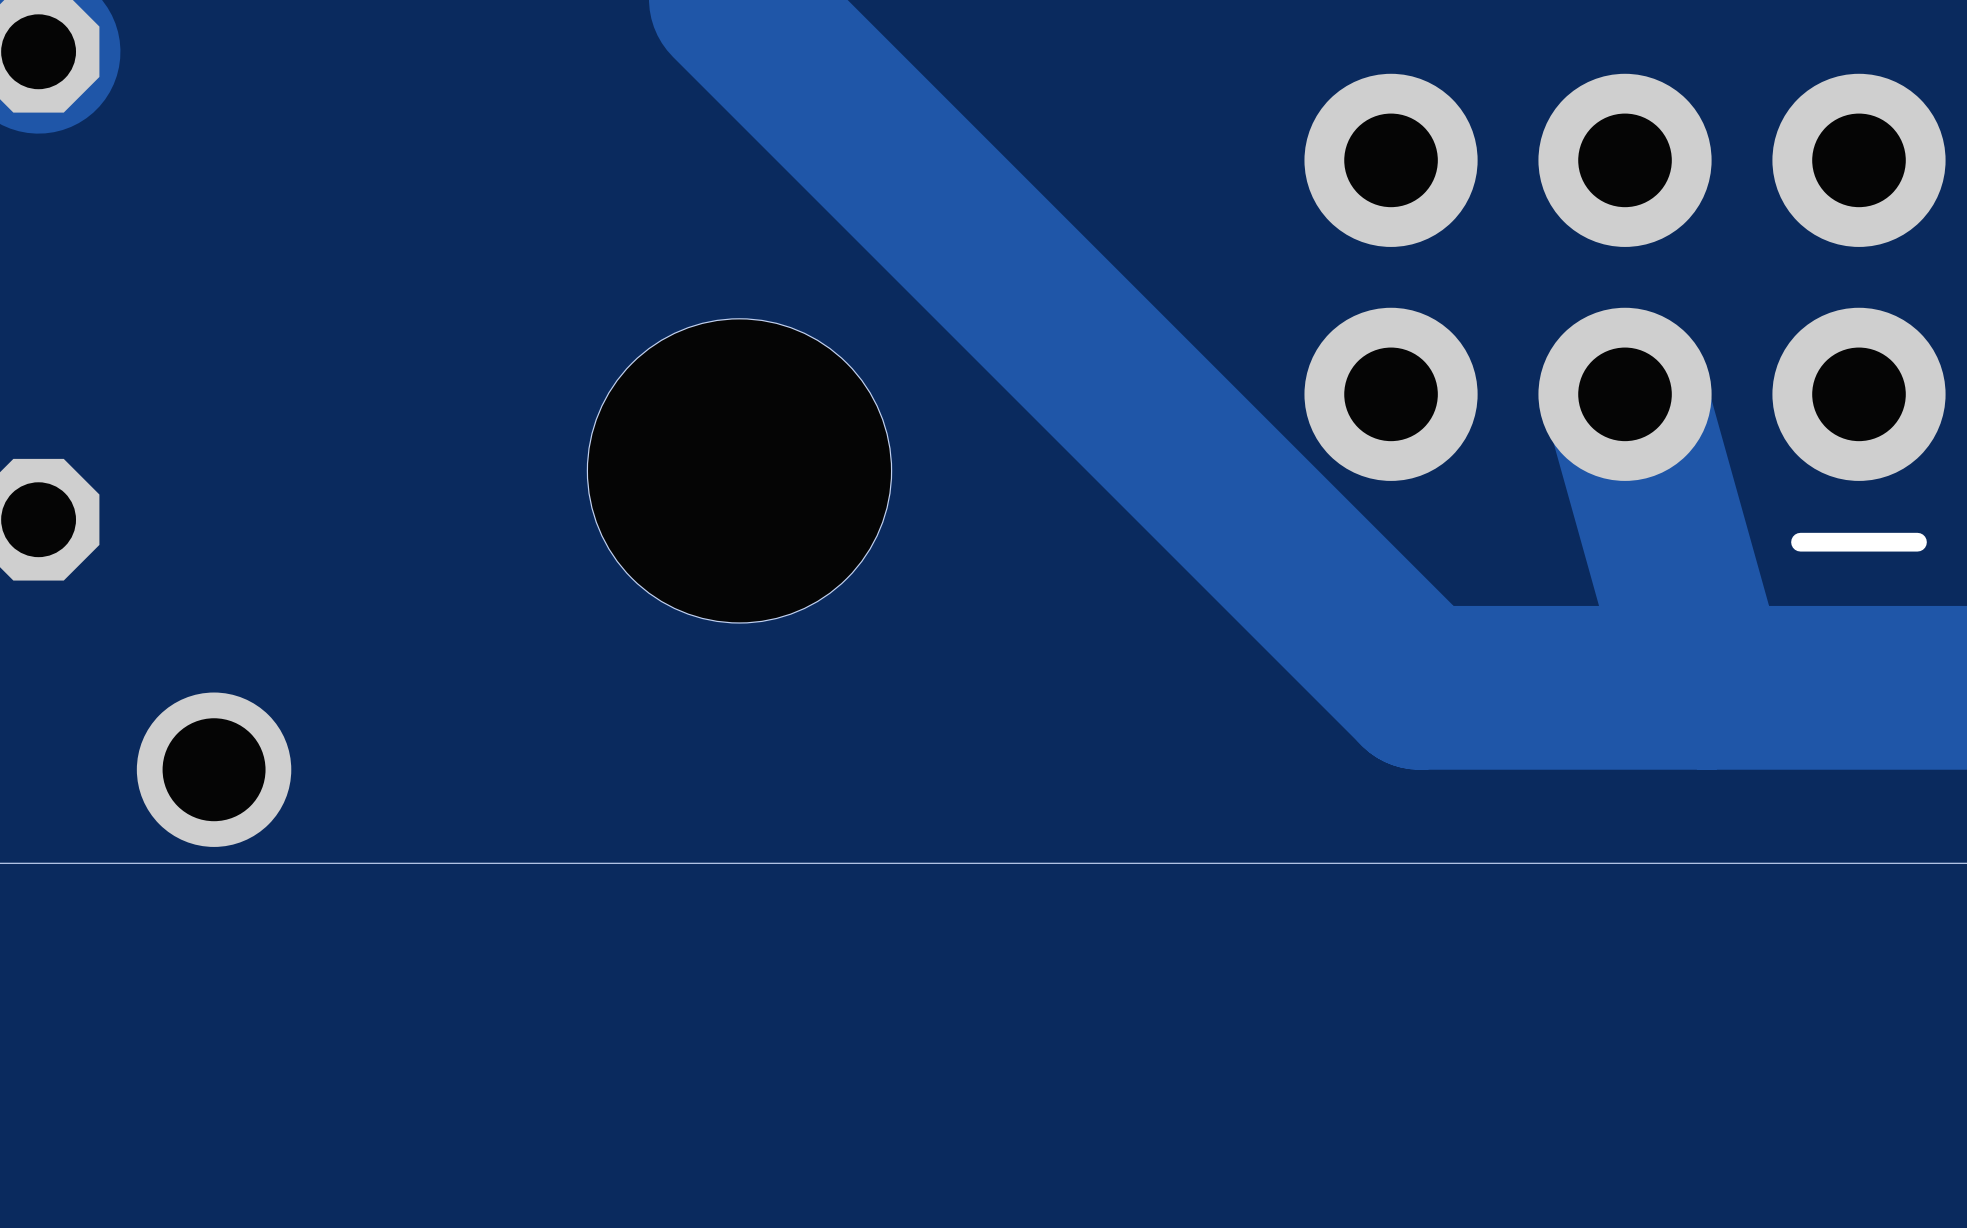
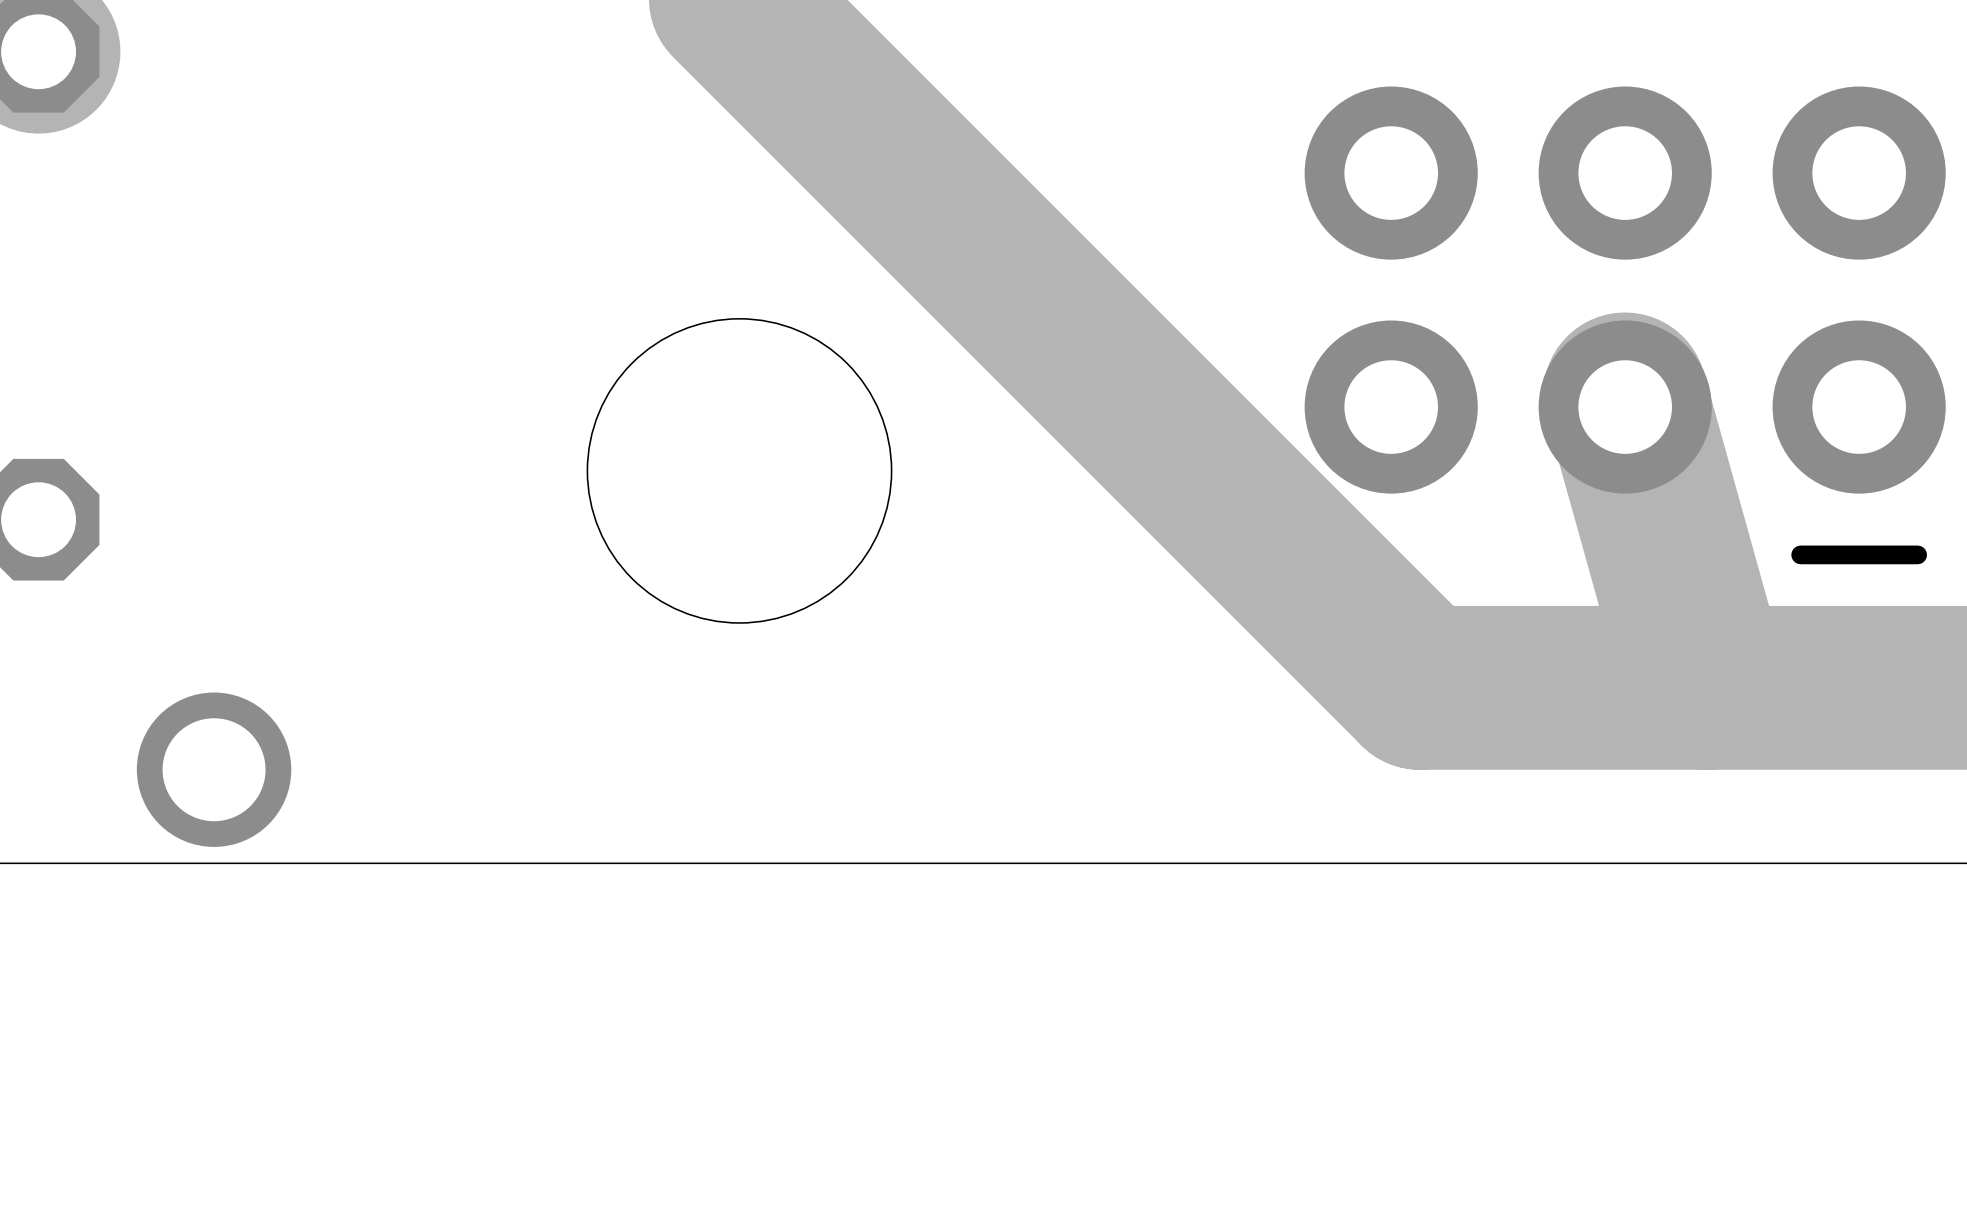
part position: (1625, 312) -> (1625, 325)

